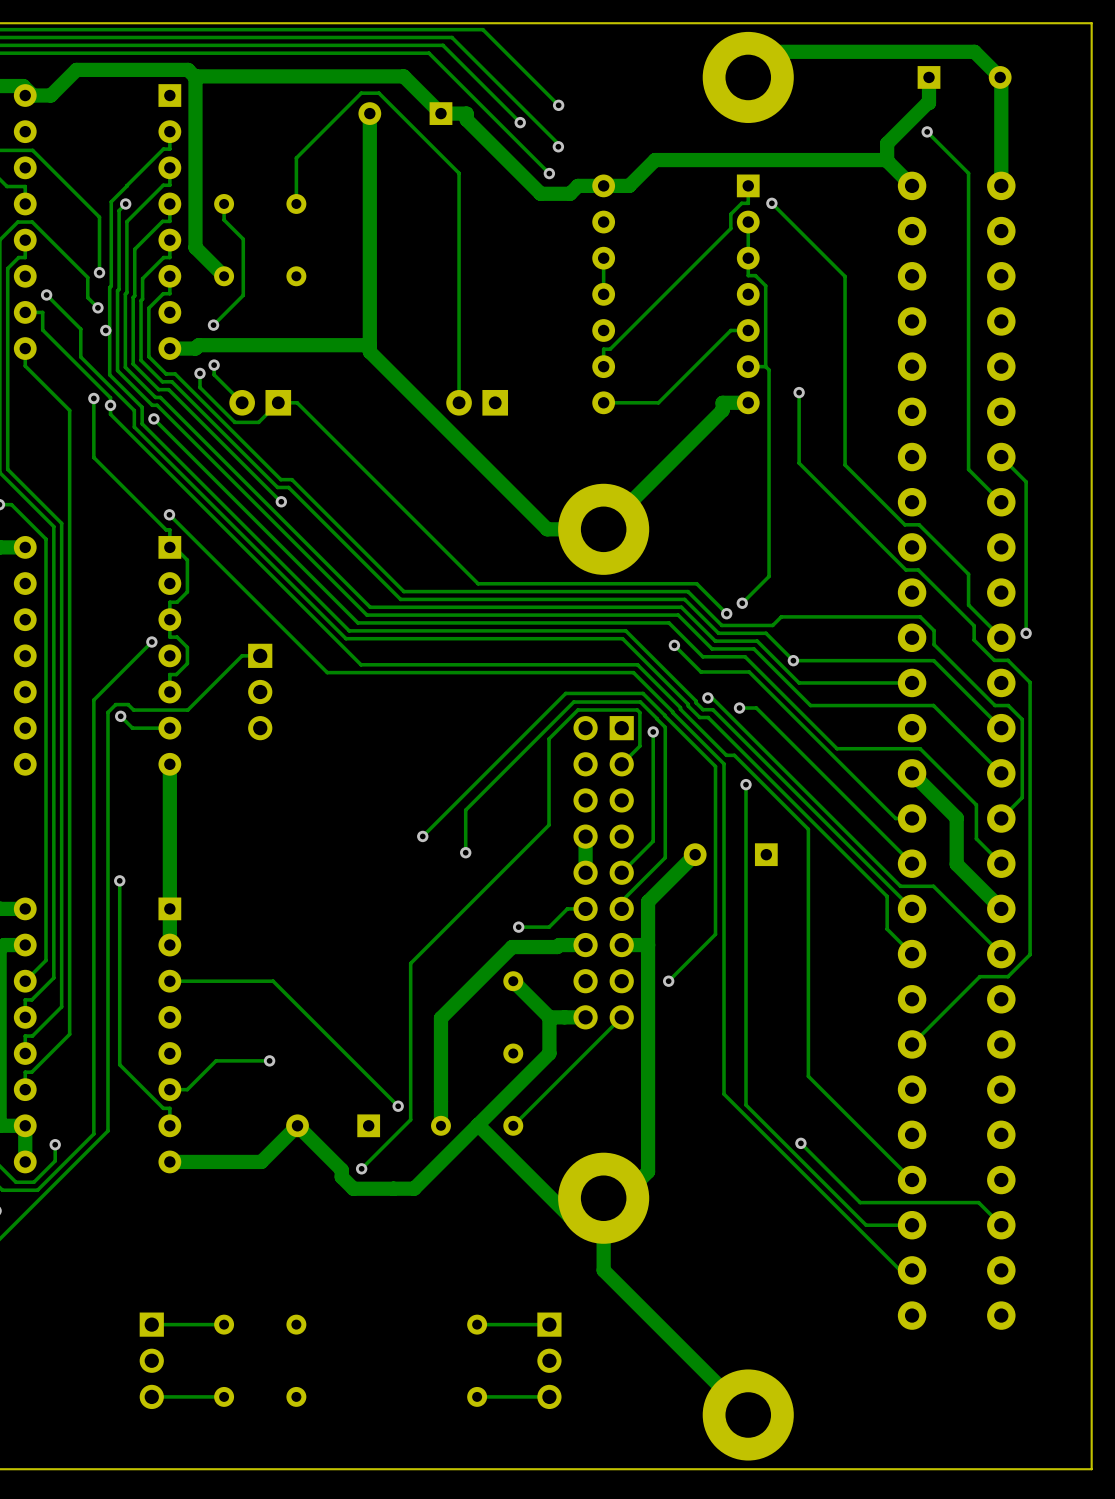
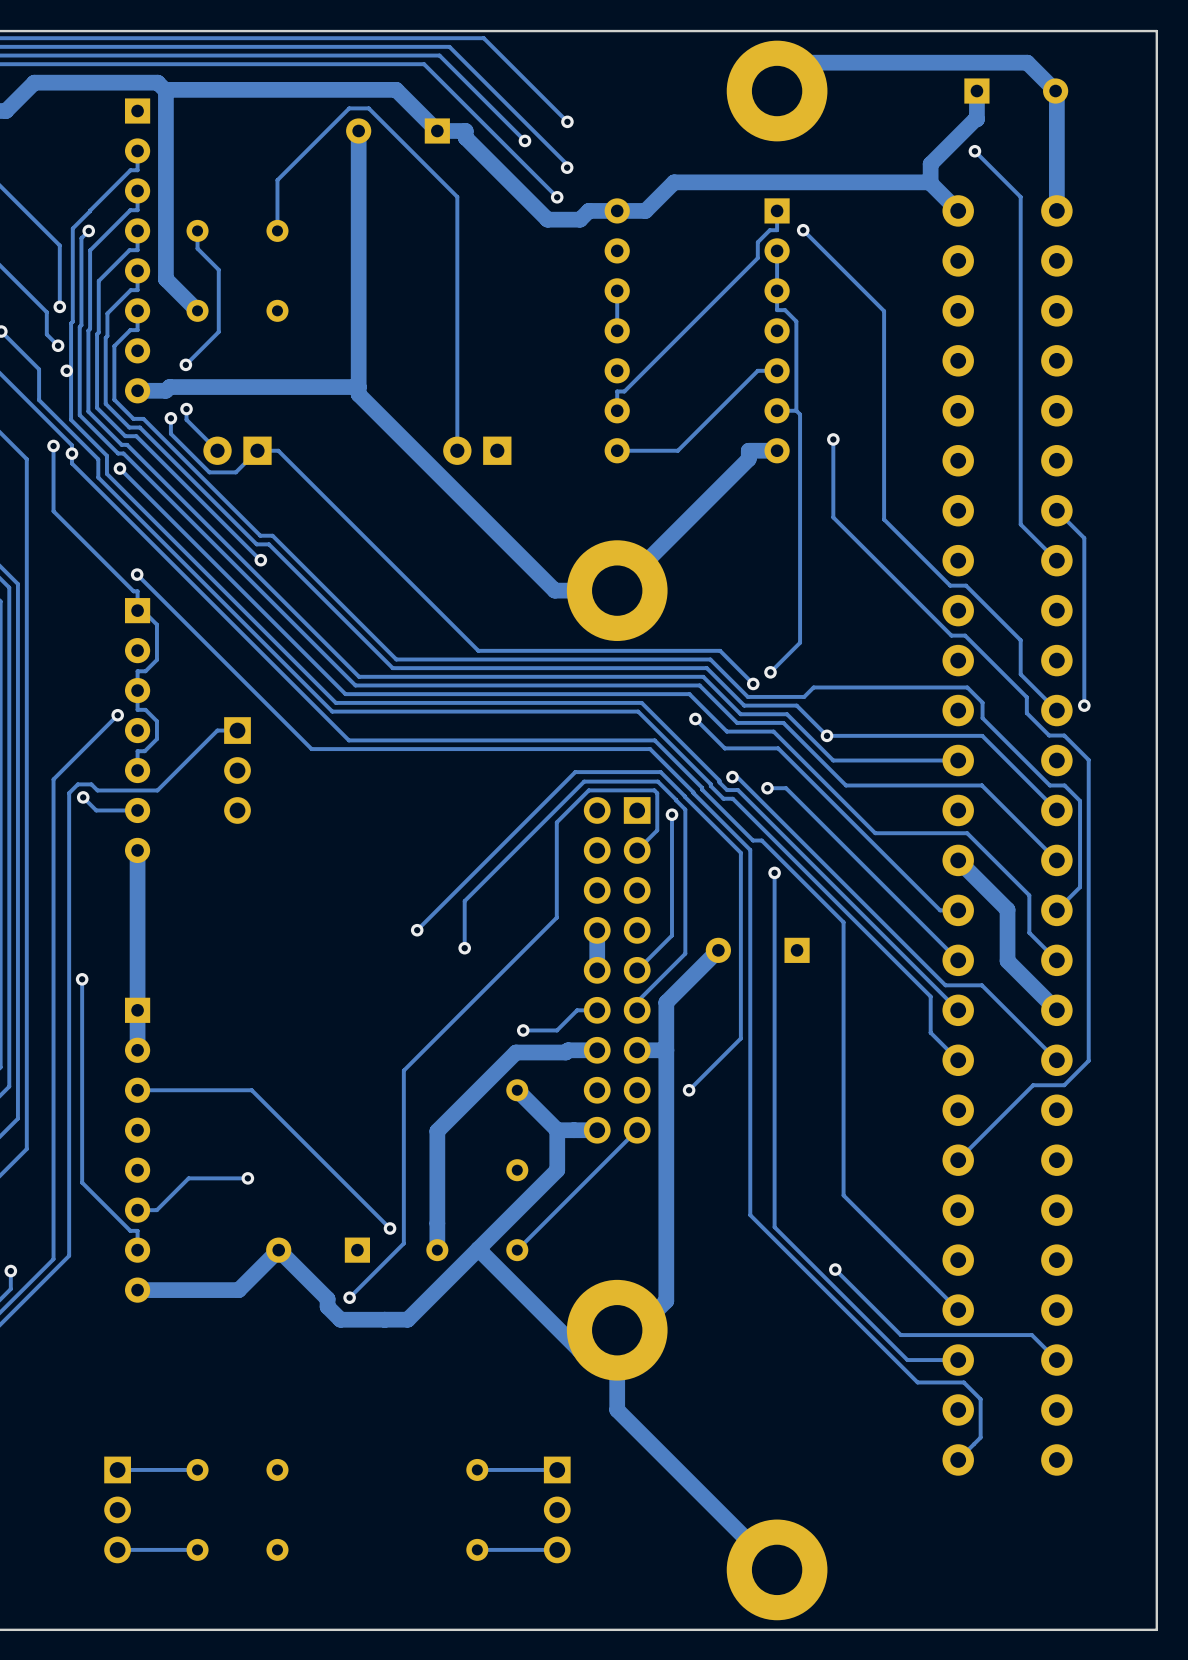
track: (875, 1245) (900, 1270) -> (917, 1382) (963, 1382) (980, 1399) (980, 1437) (958, 1459)

